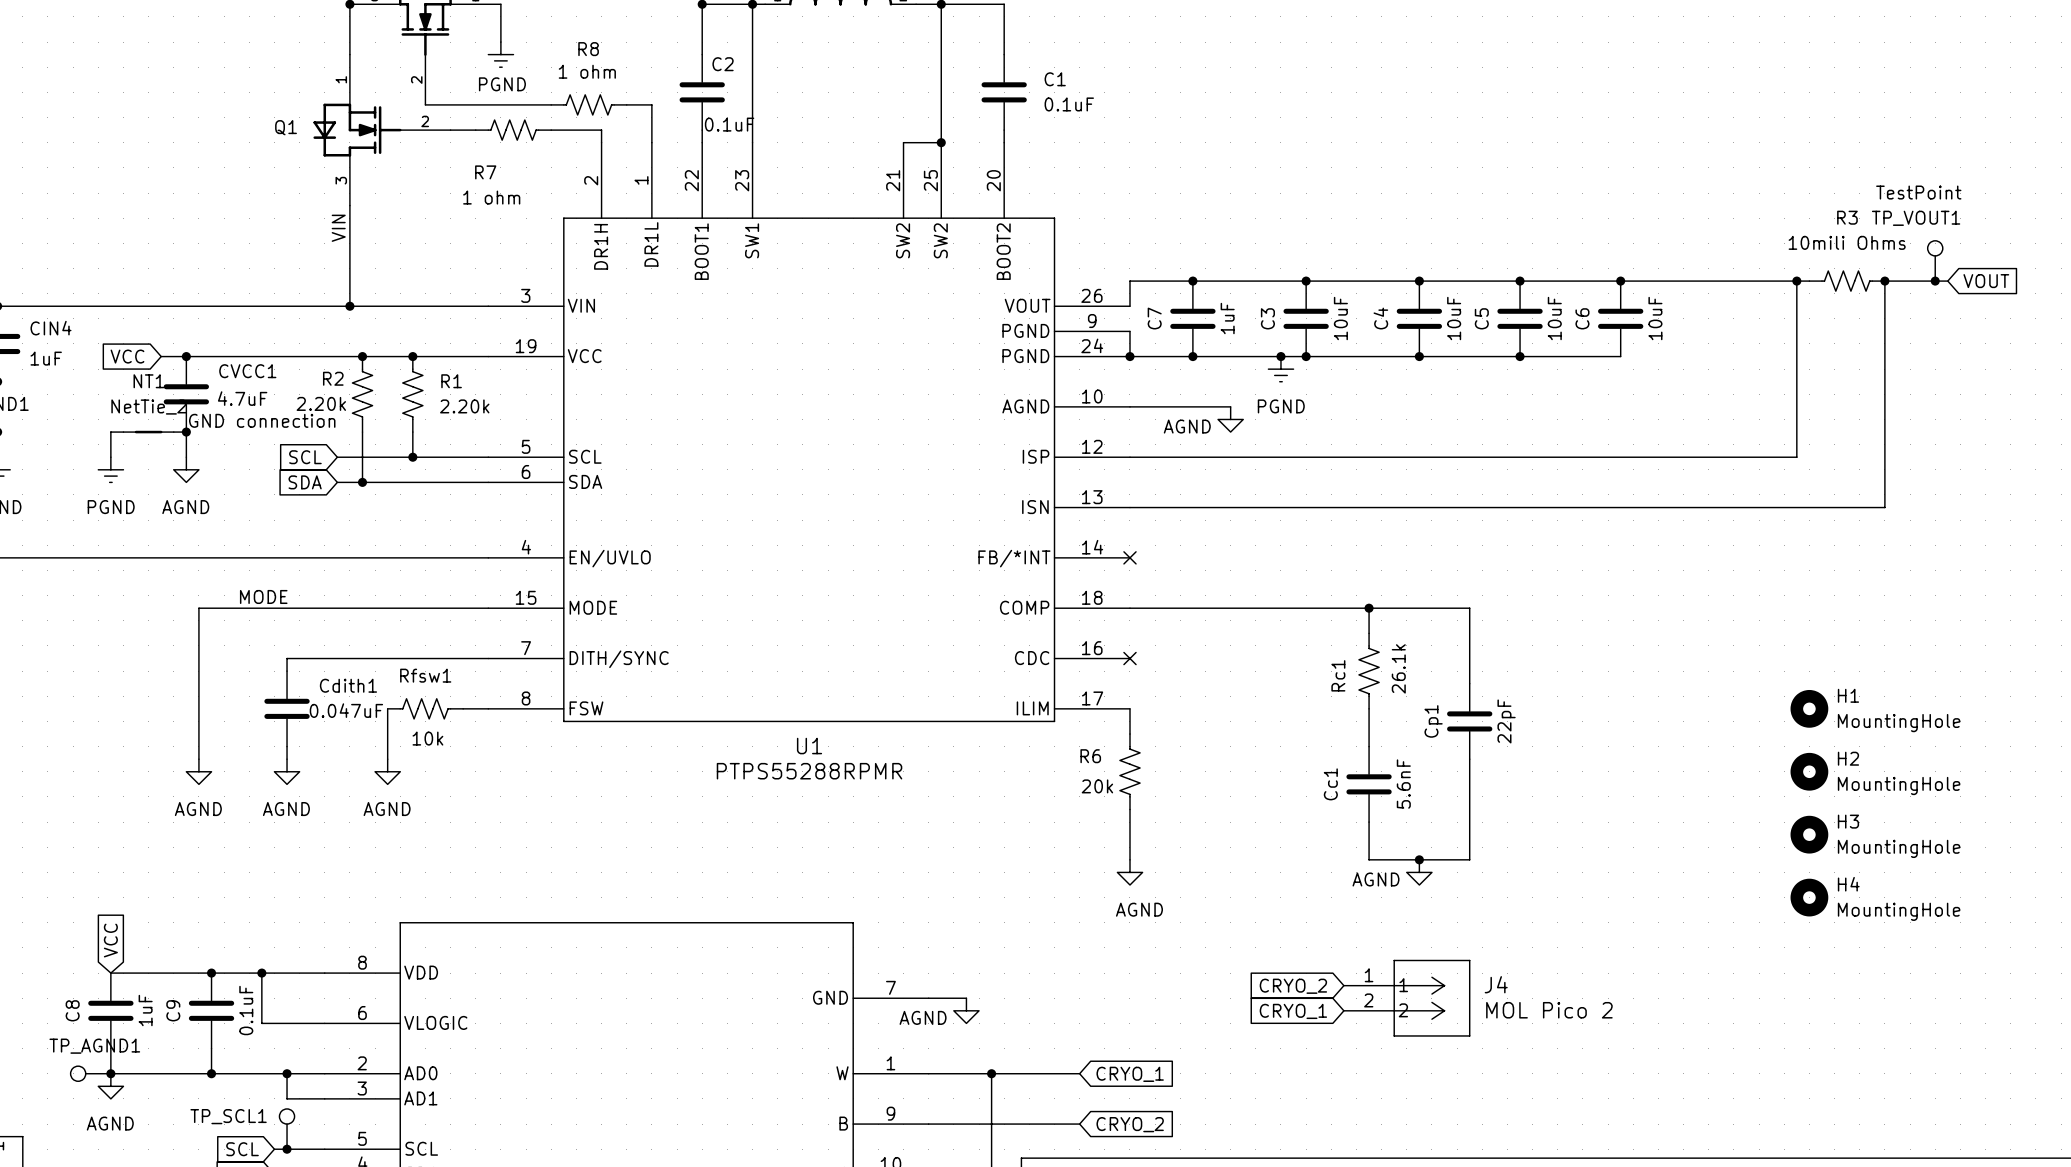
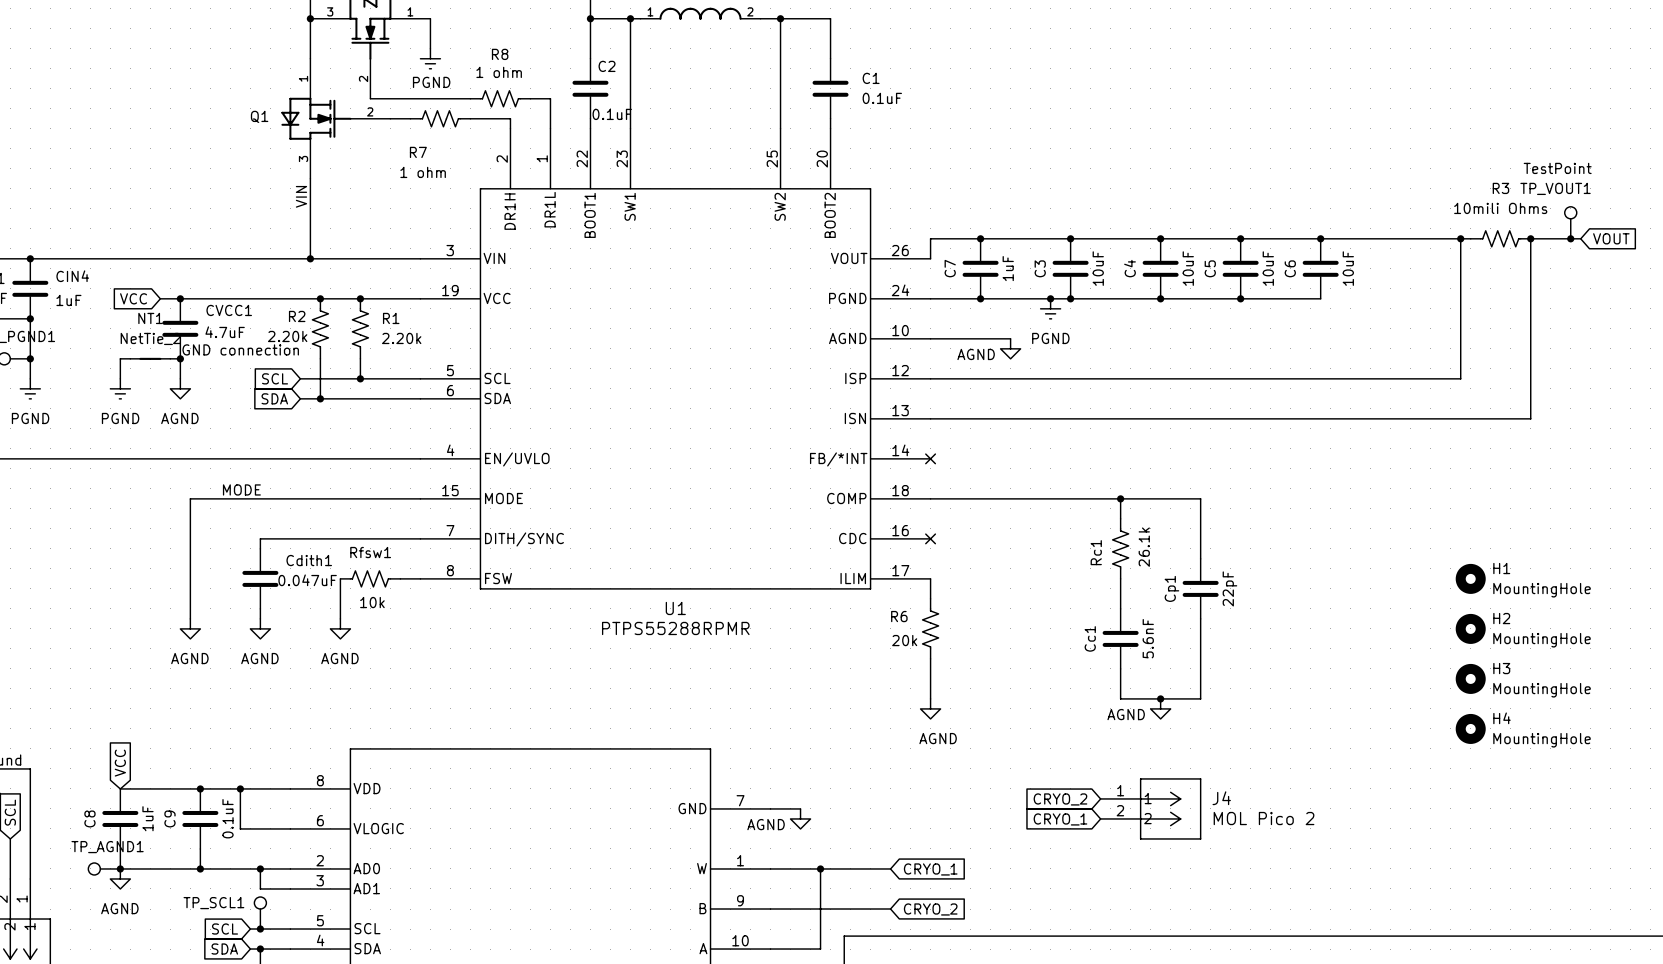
U1 symbol: [488, 142, 1130, 723] -> [420, 128, 931, 590]
wire: (903, 142) (941, 142) -> none
junction: (941, 142) -> none
wire: (1129, 331) (1129, 356) -> none
junction: (1129, 356) -> none

